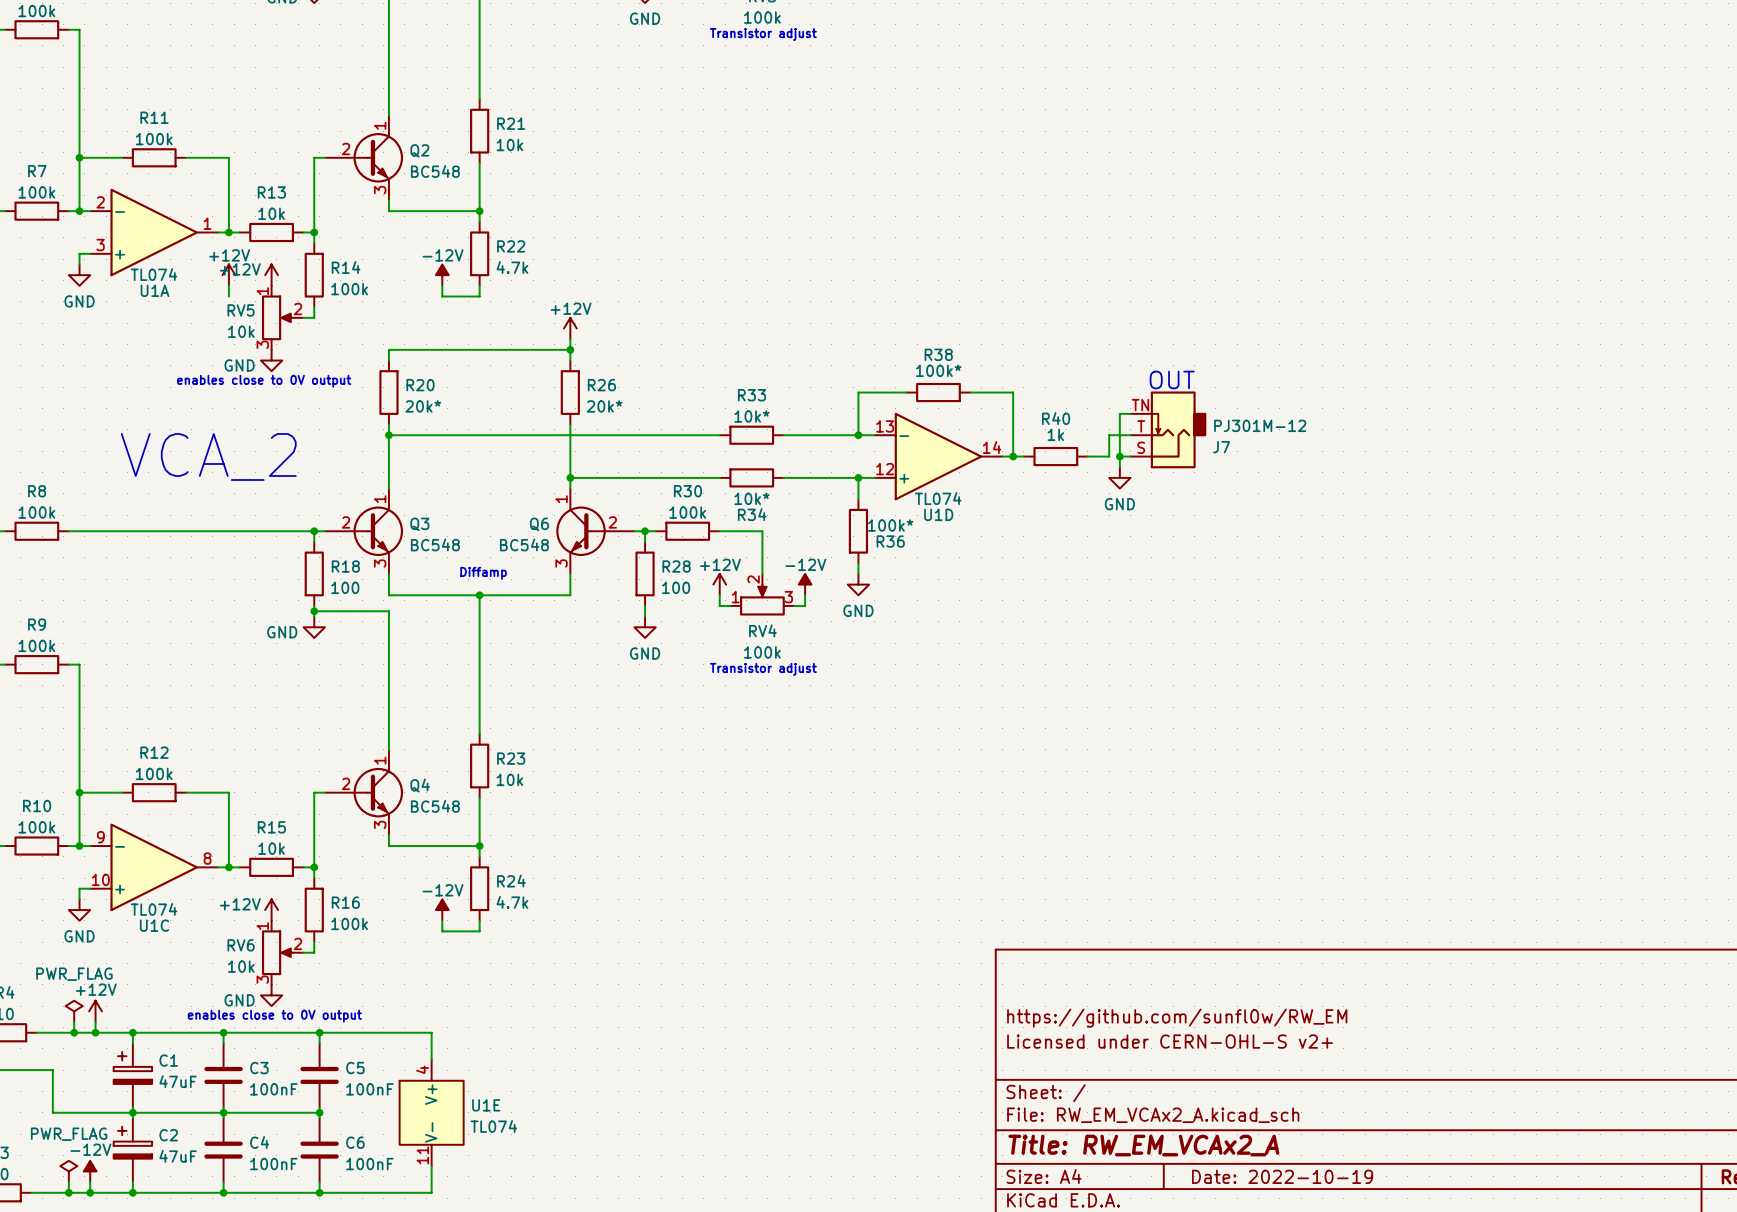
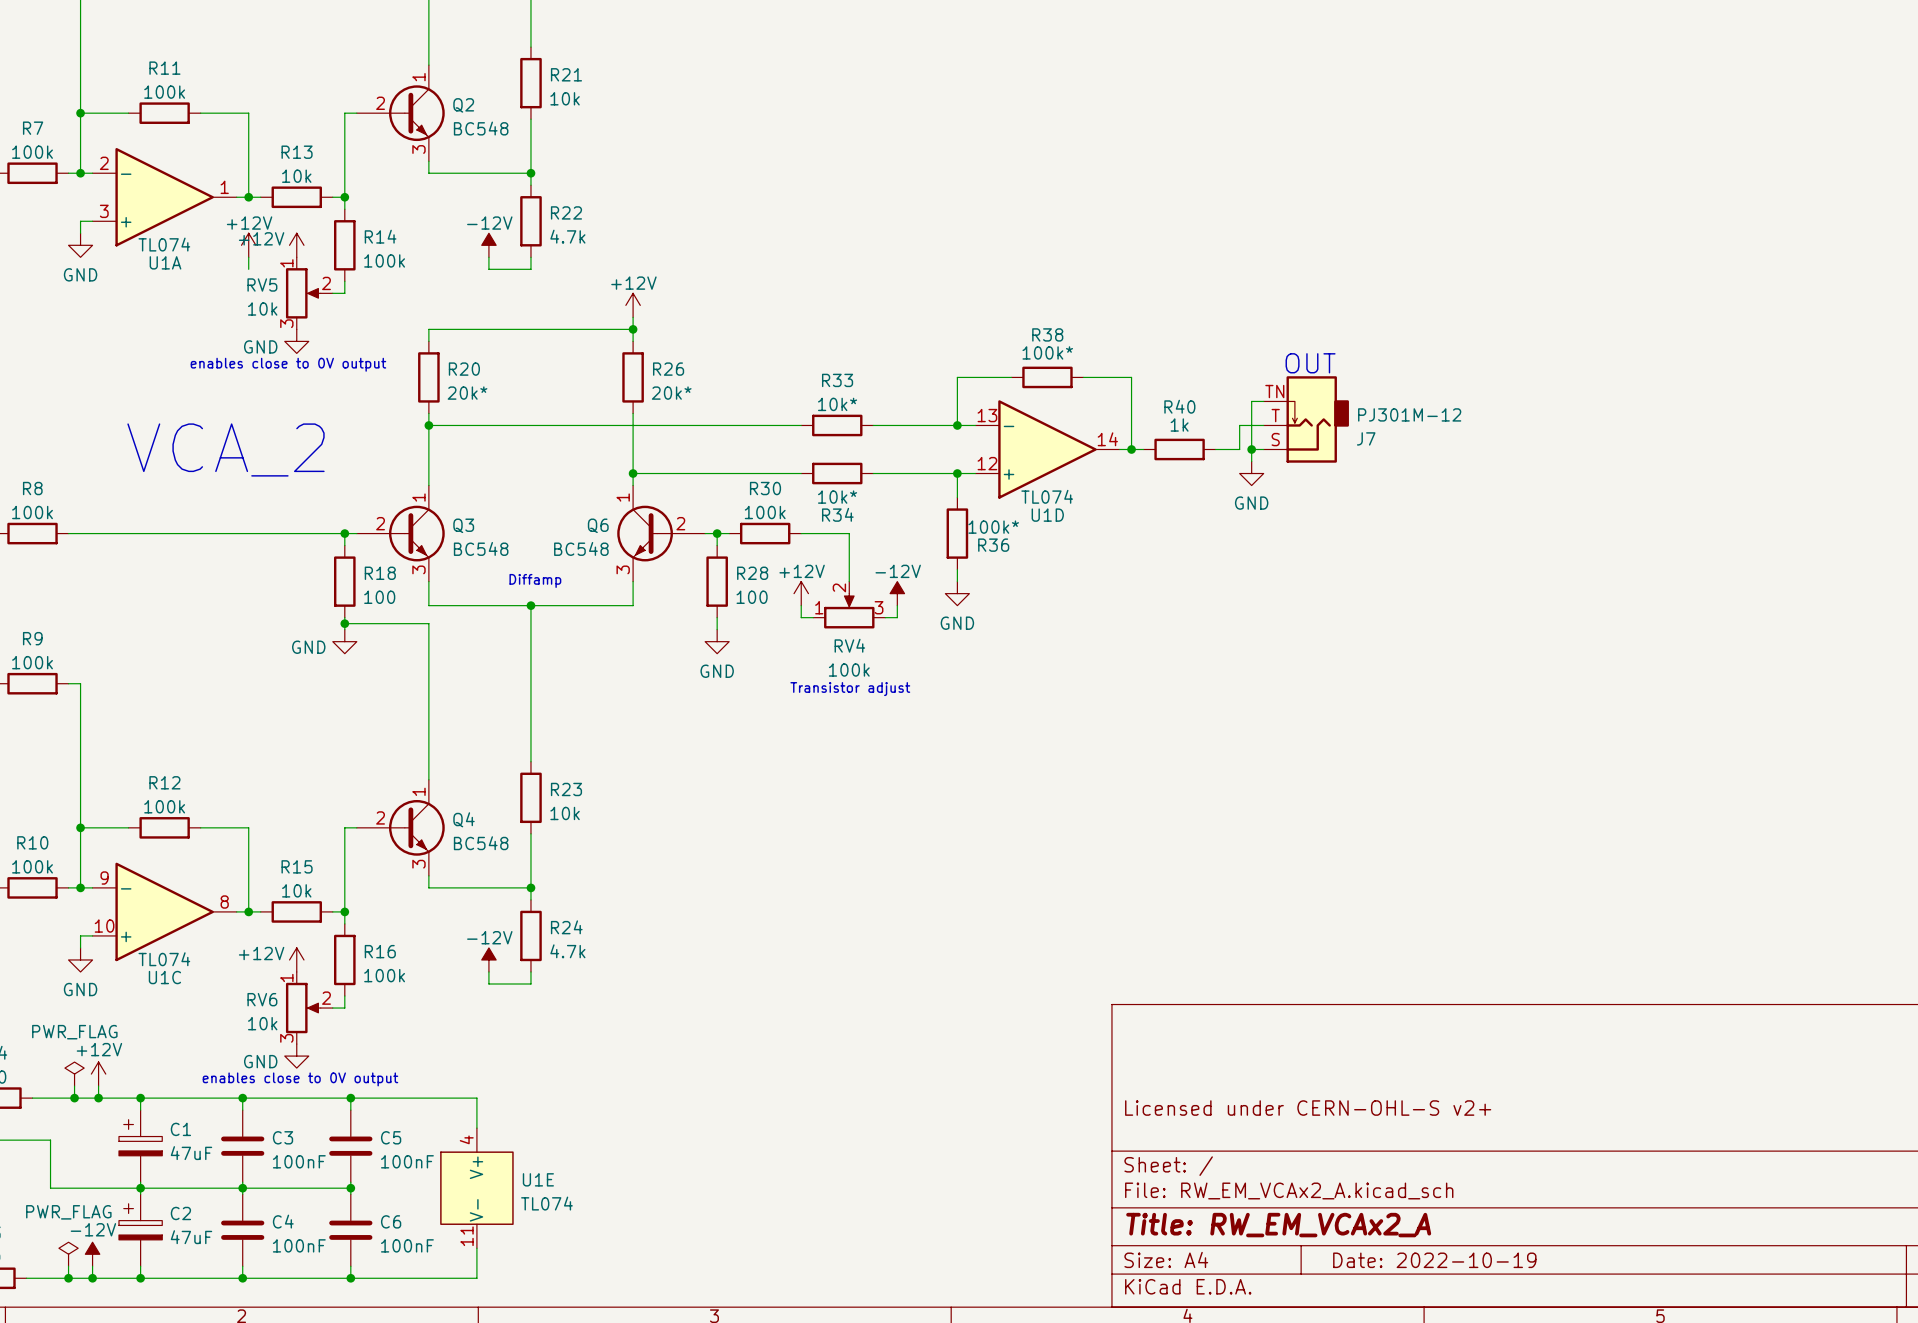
title block: https://github.com/sunfl0w/RW_EM (1177, 1018) -> none

